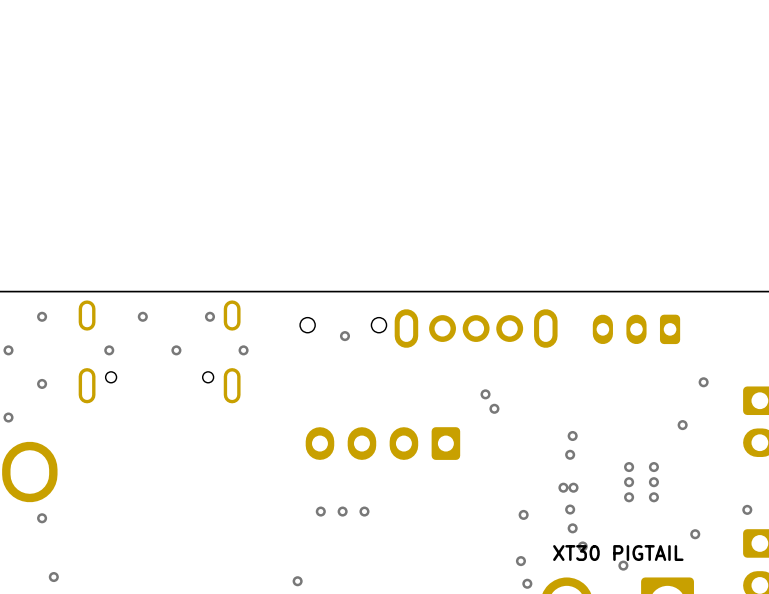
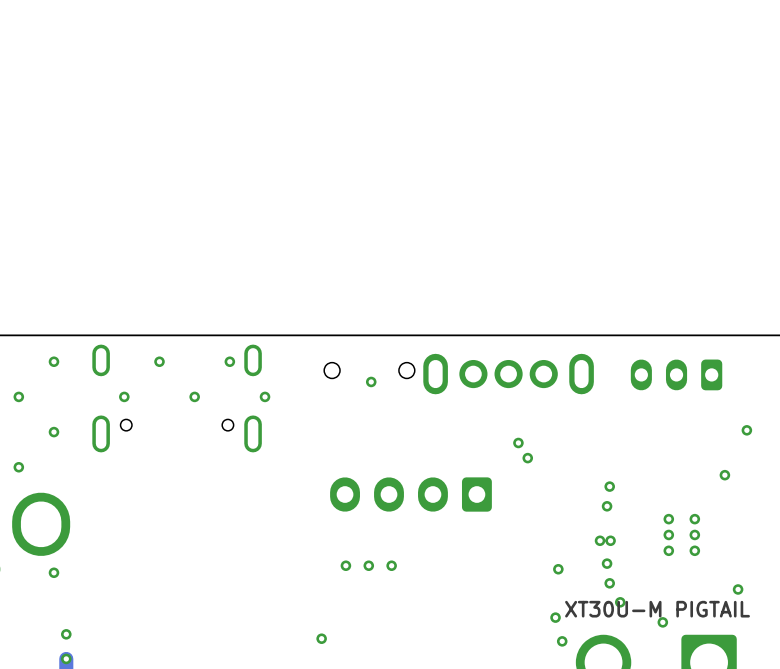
text: XT30 PIGTAIL (618, 553) -> XT30U-M PIGTAIL (657, 609)

